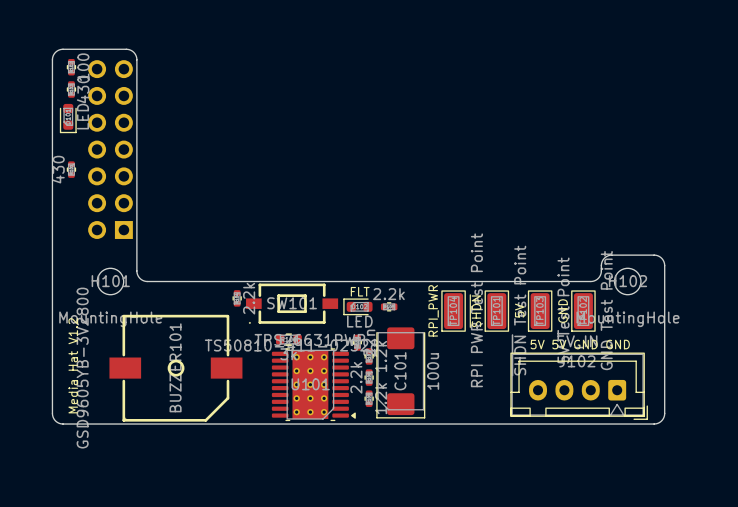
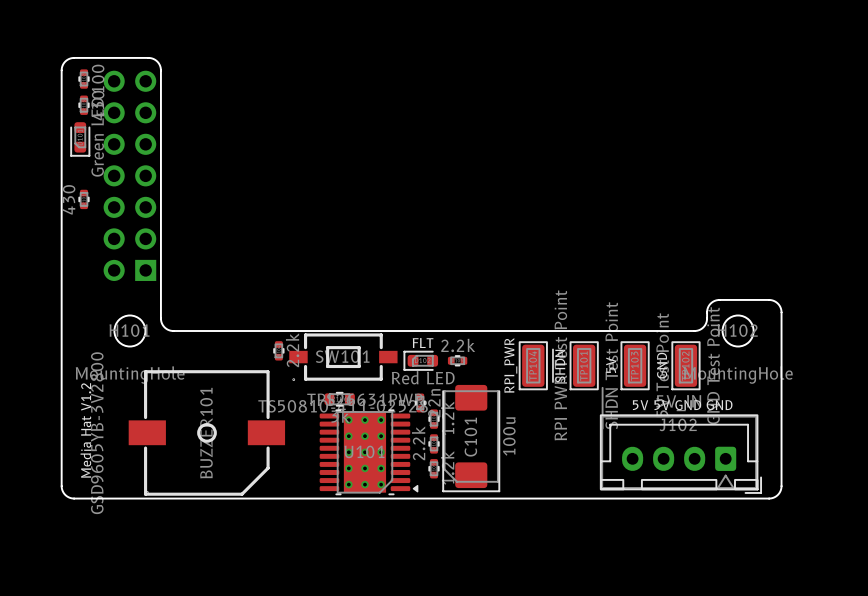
part value: LED (82, 116) -> Green LED (97, 137)
part value: LED (359, 321) -> Red LED (423, 377)

